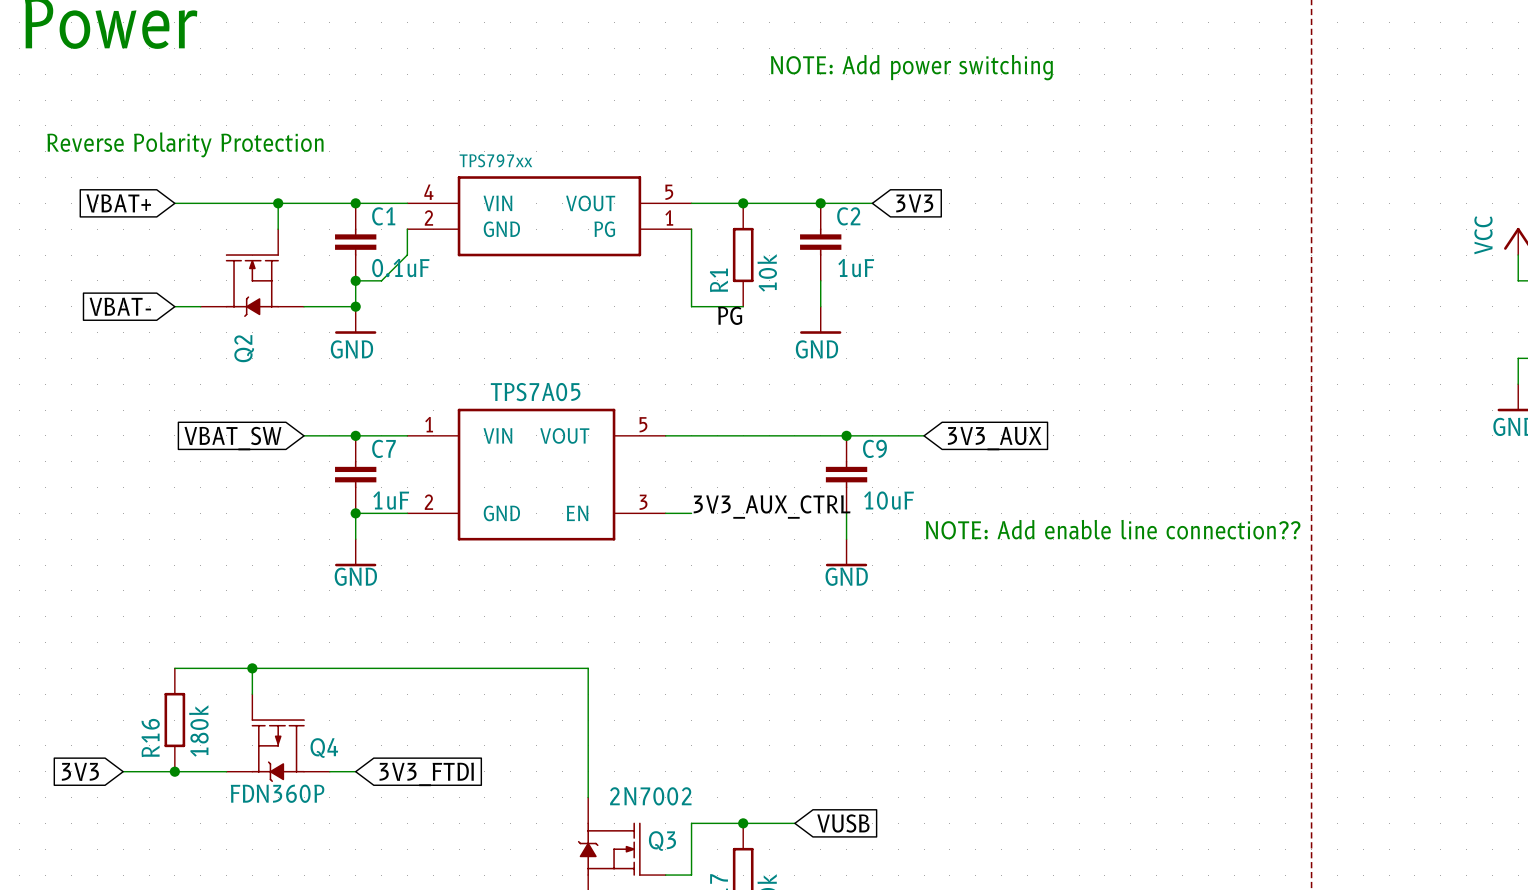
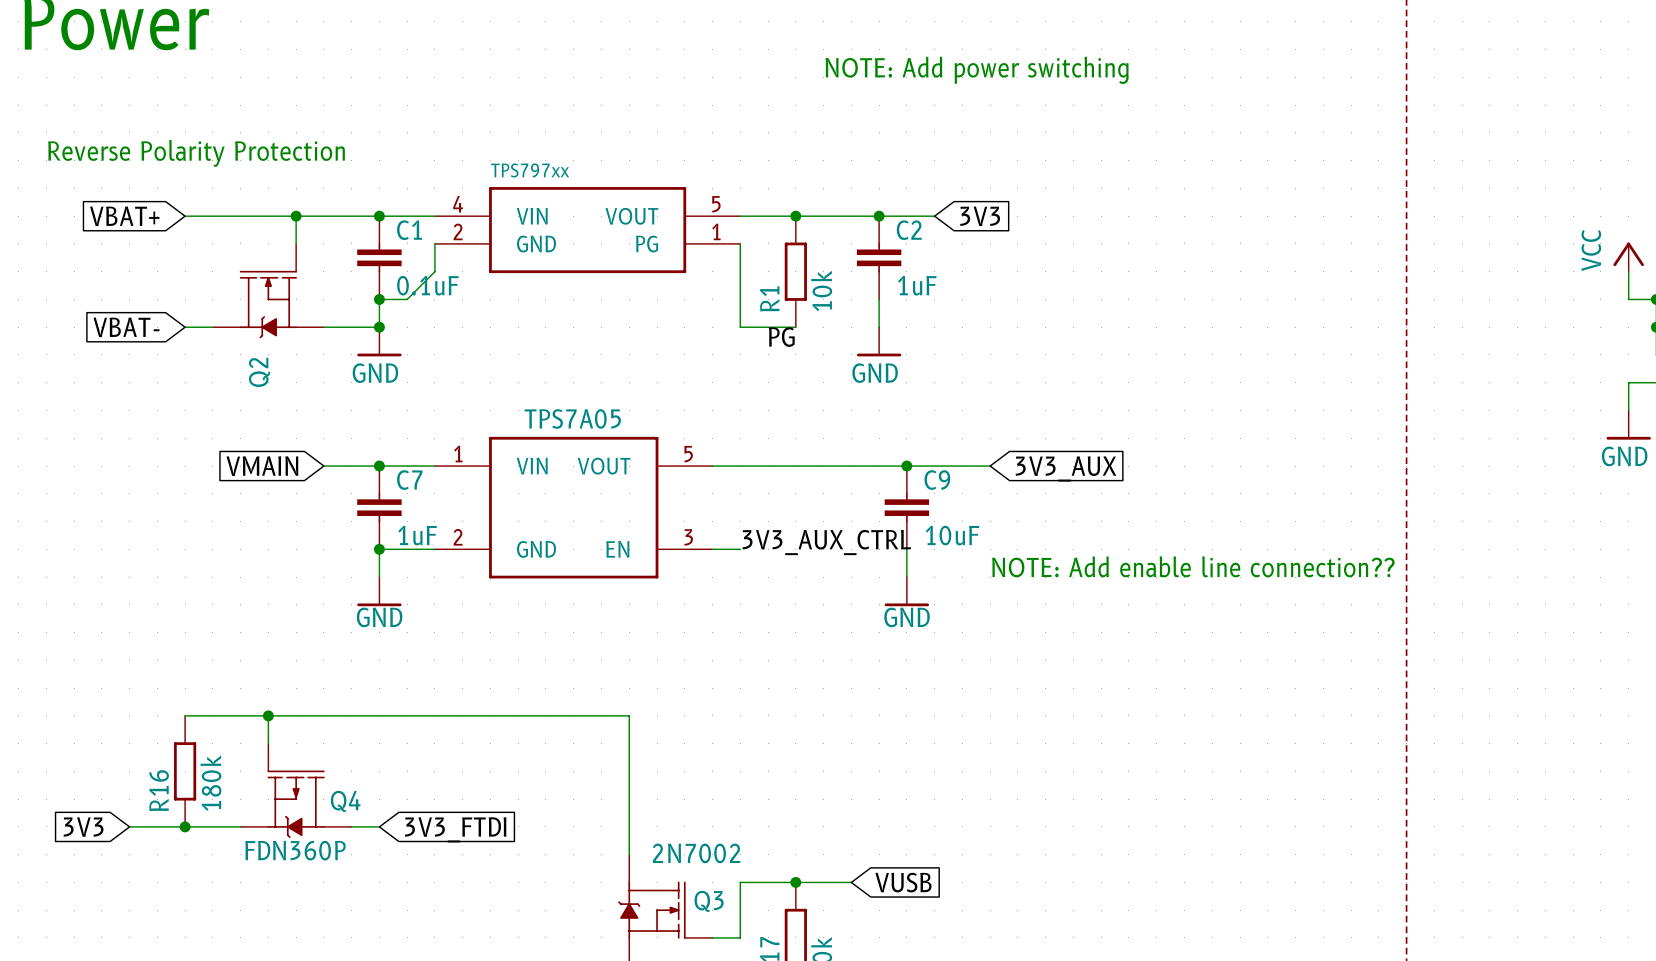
global label: VBAT_SW (232, 438) -> VMAIN (262, 466)

